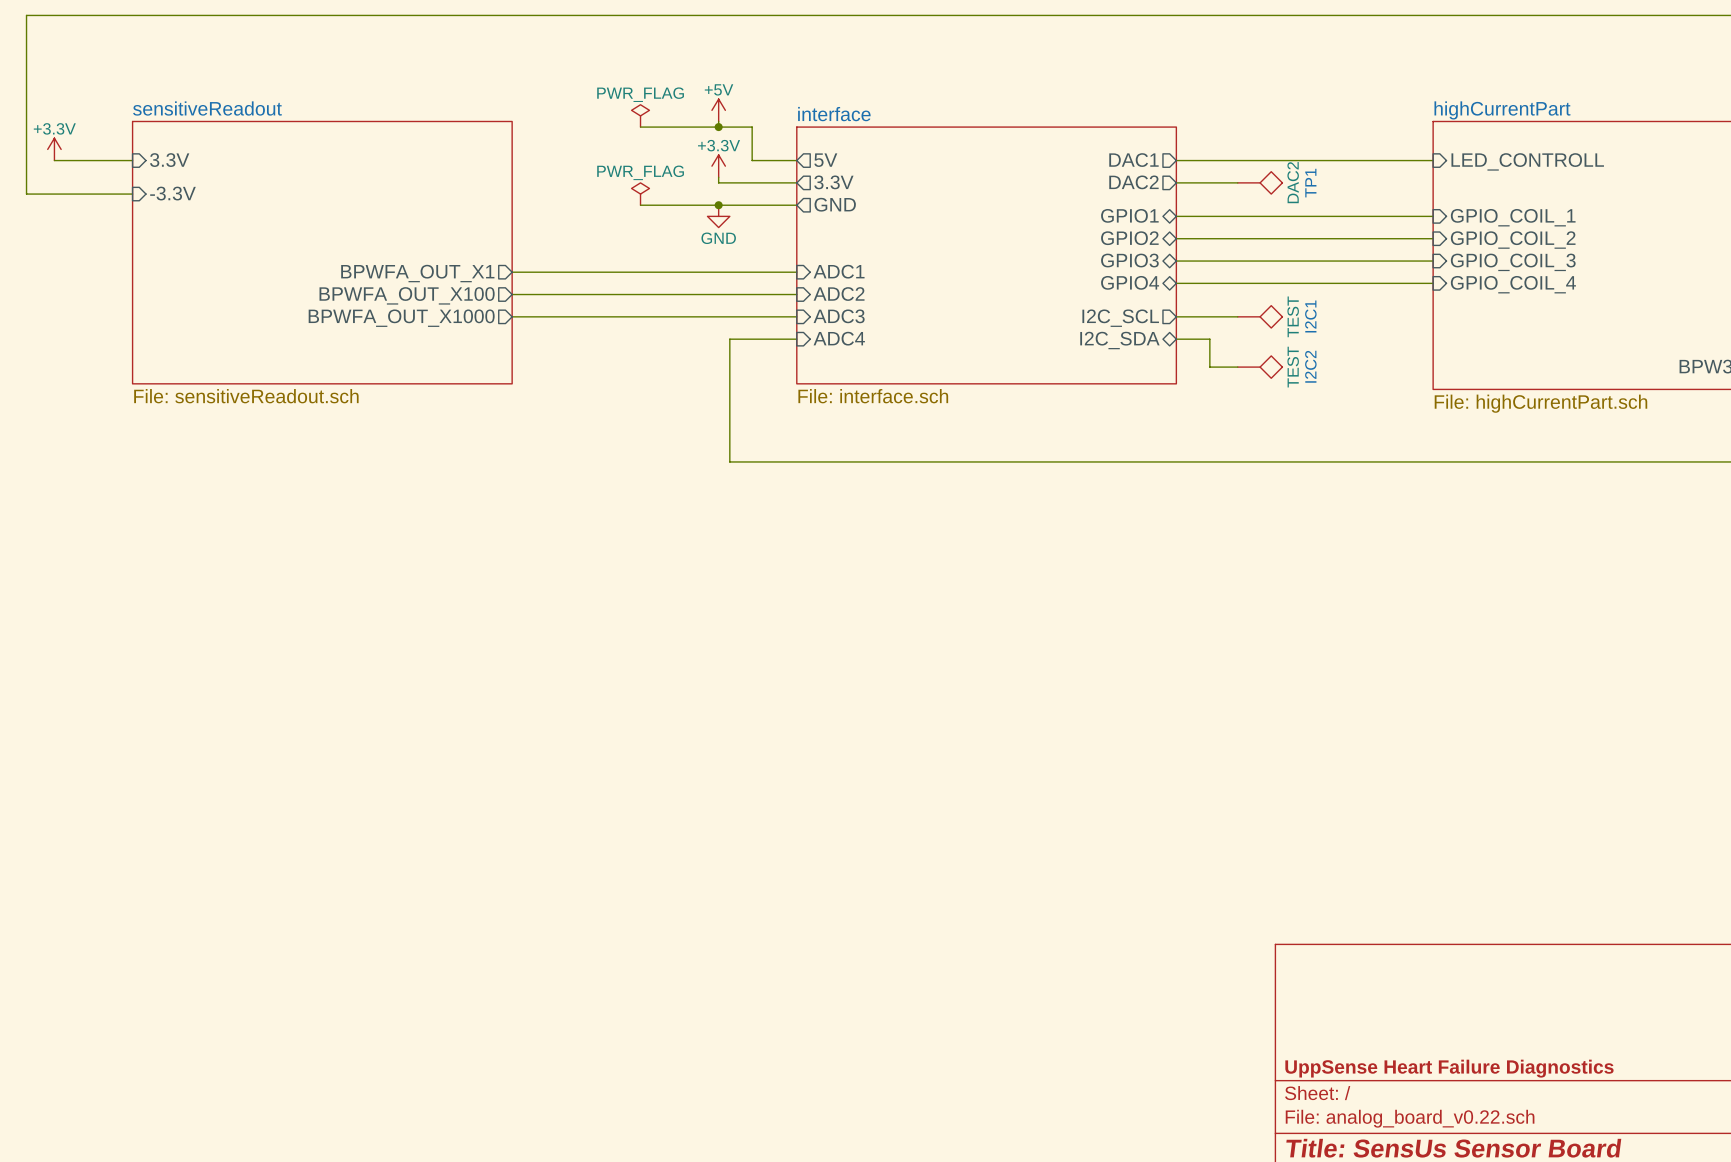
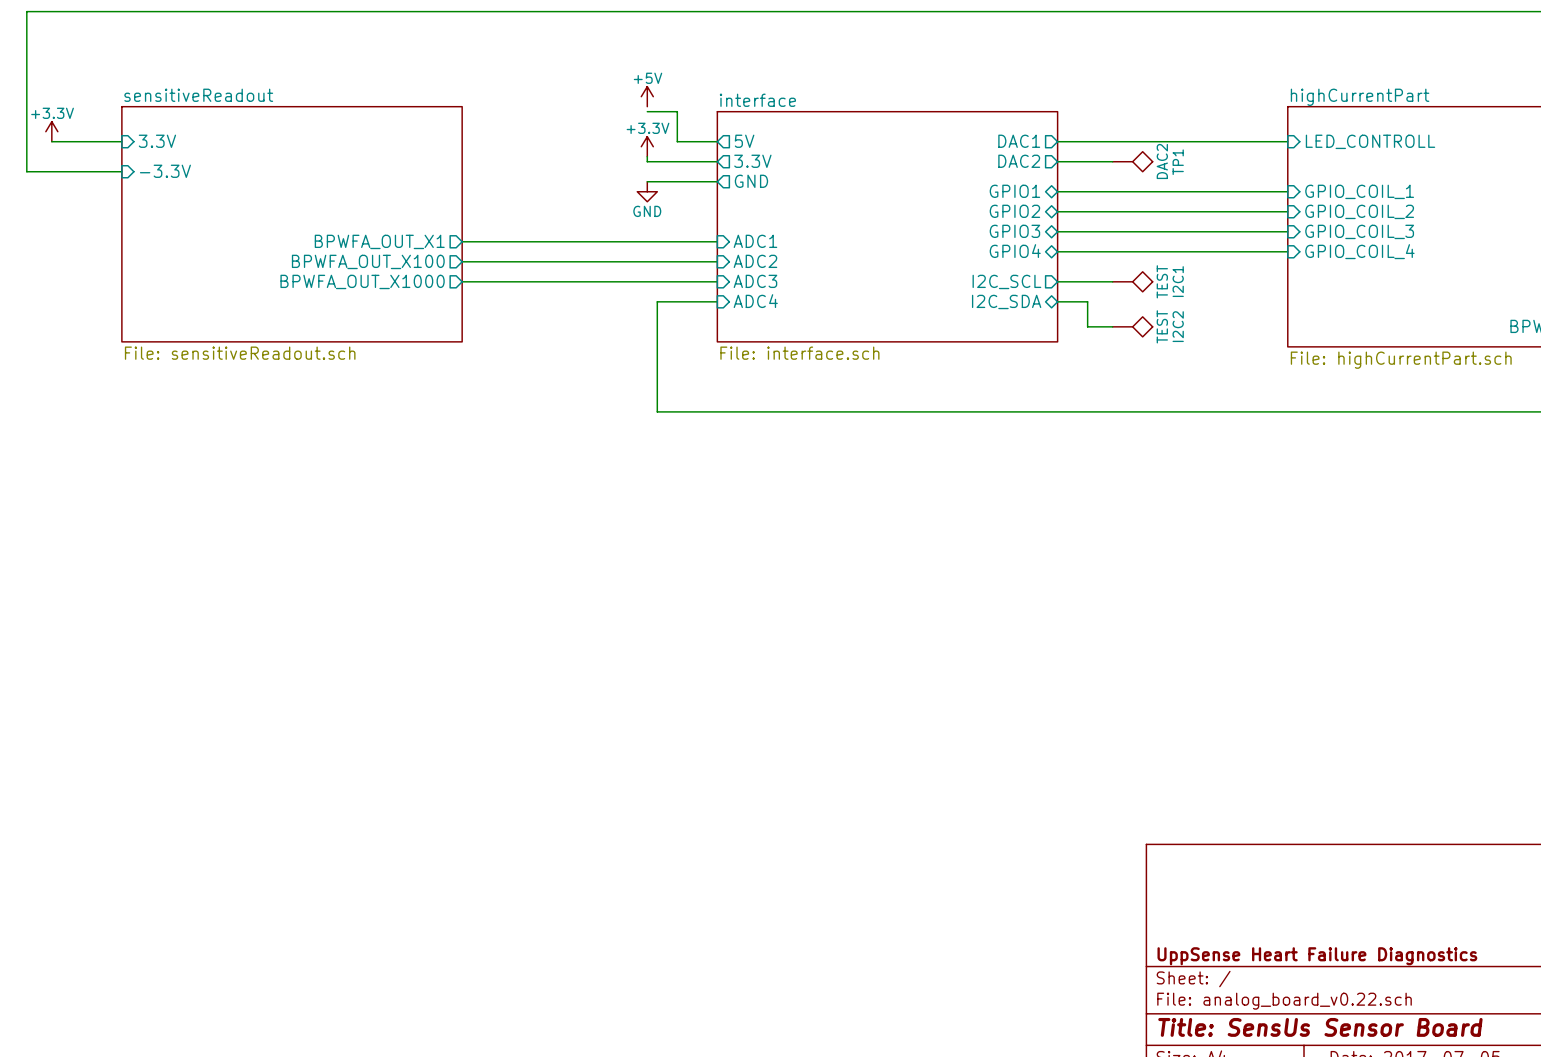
power symbol: PWR_FLAG (640, 115) -> none
wire: (718, 121) (718, 127) (640, 127) -> none
junction: (718, 127) -> none
power symbol: PWR_FLAG (640, 194) -> none
wire: (640, 205) (718, 205) -> none
junction: (718, 205) -> none

